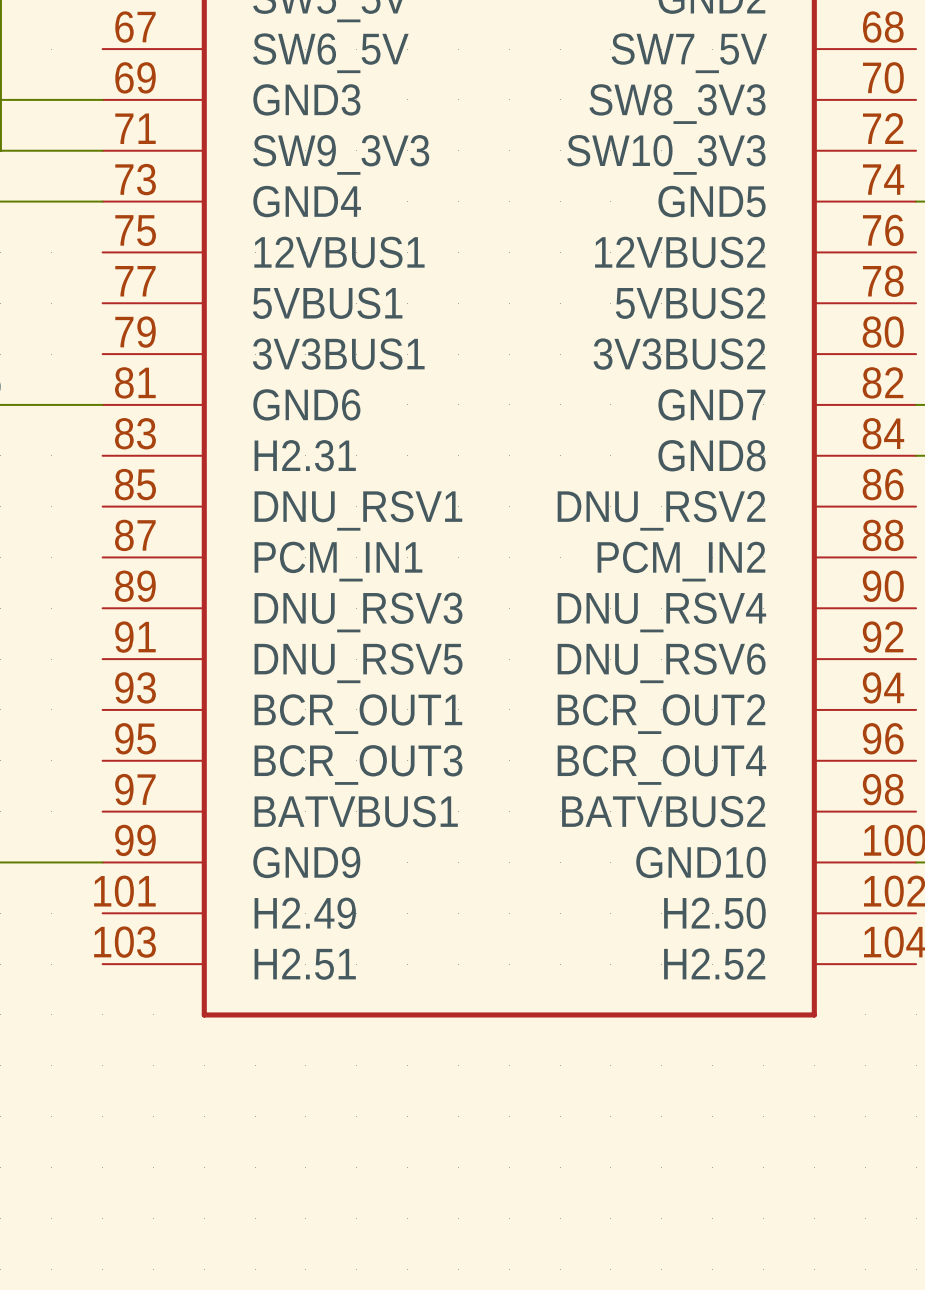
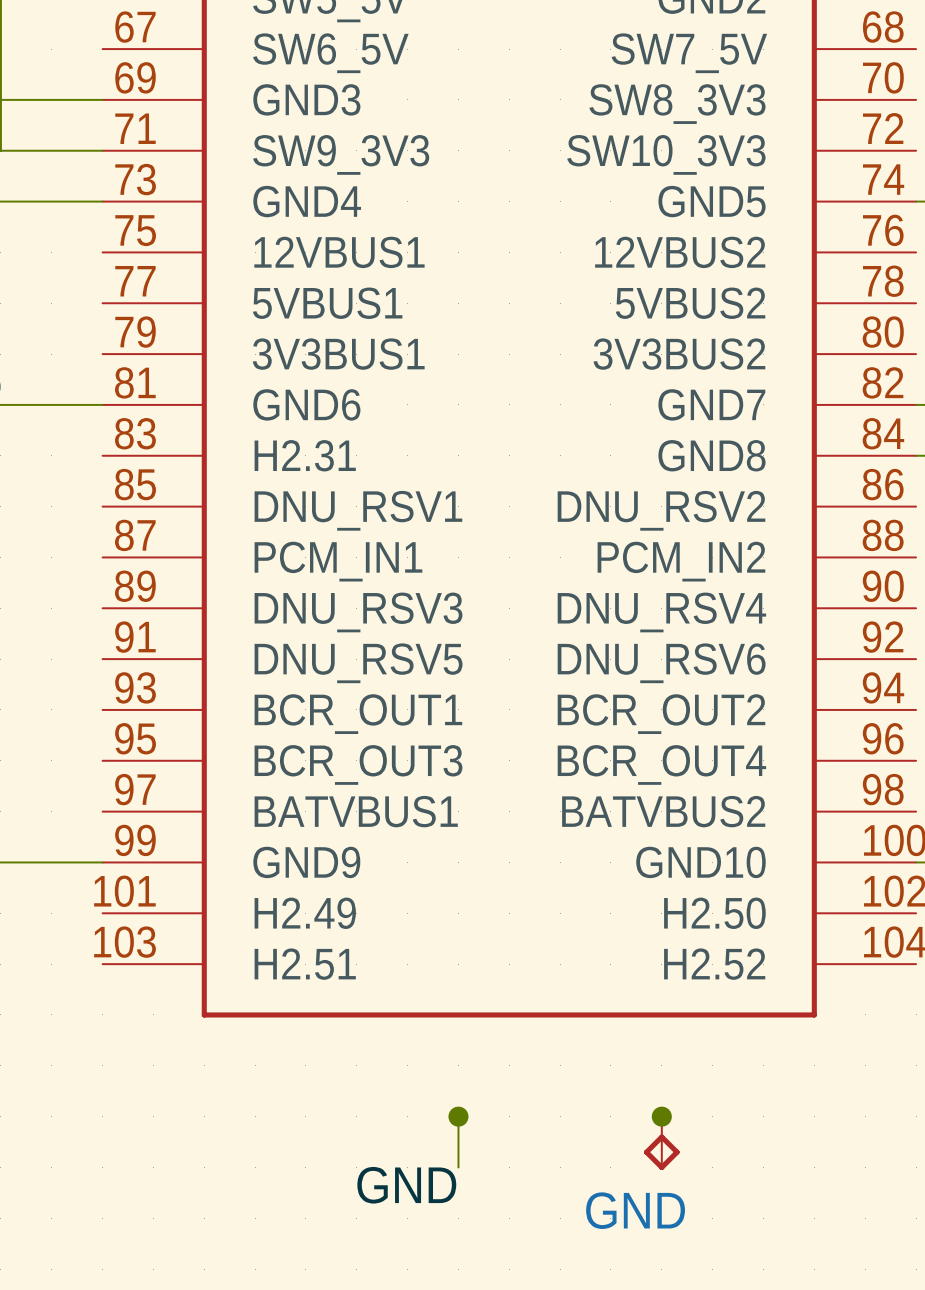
wire: none -> (458, 1116) (458, 1167)
junction: none -> (458, 1116)
junction: none -> (661, 1116)
GND: none -> (661, 1143)
label: none -> GND (406, 1185)

